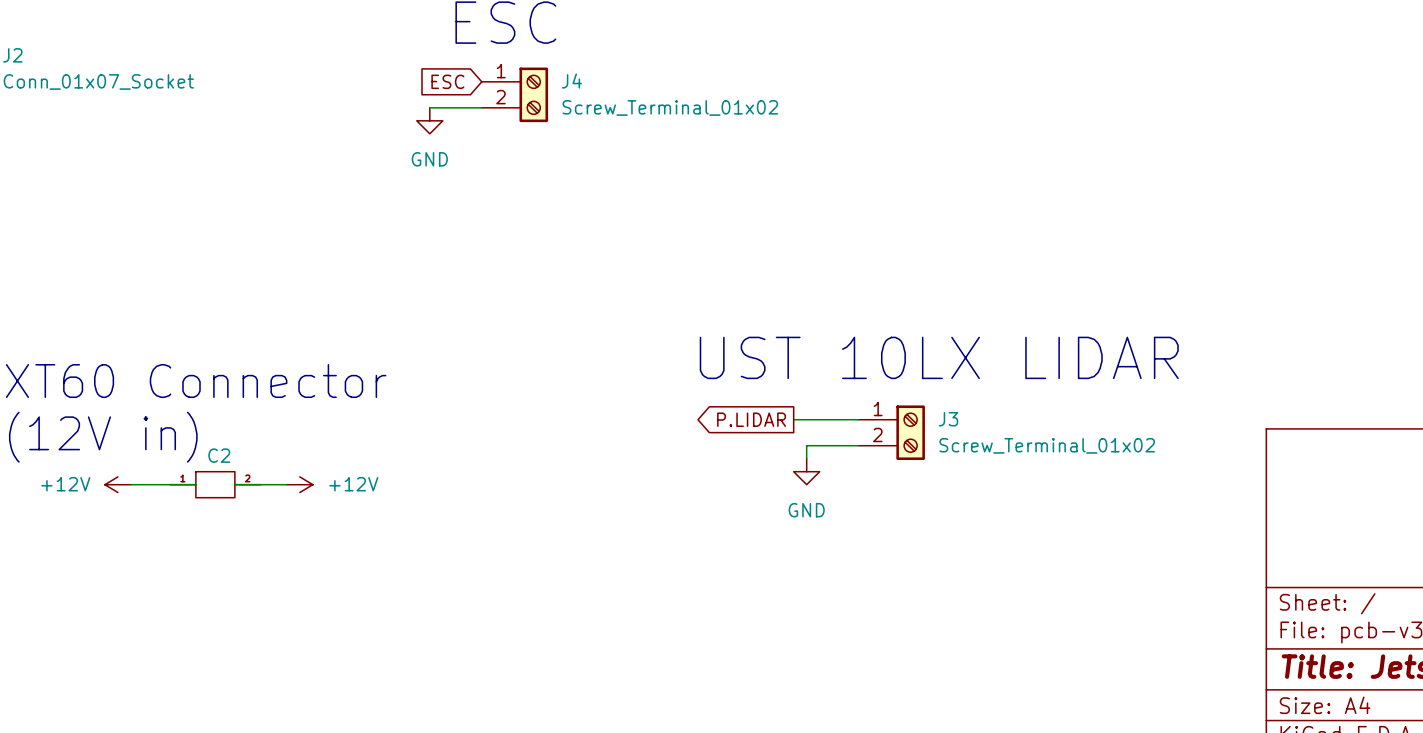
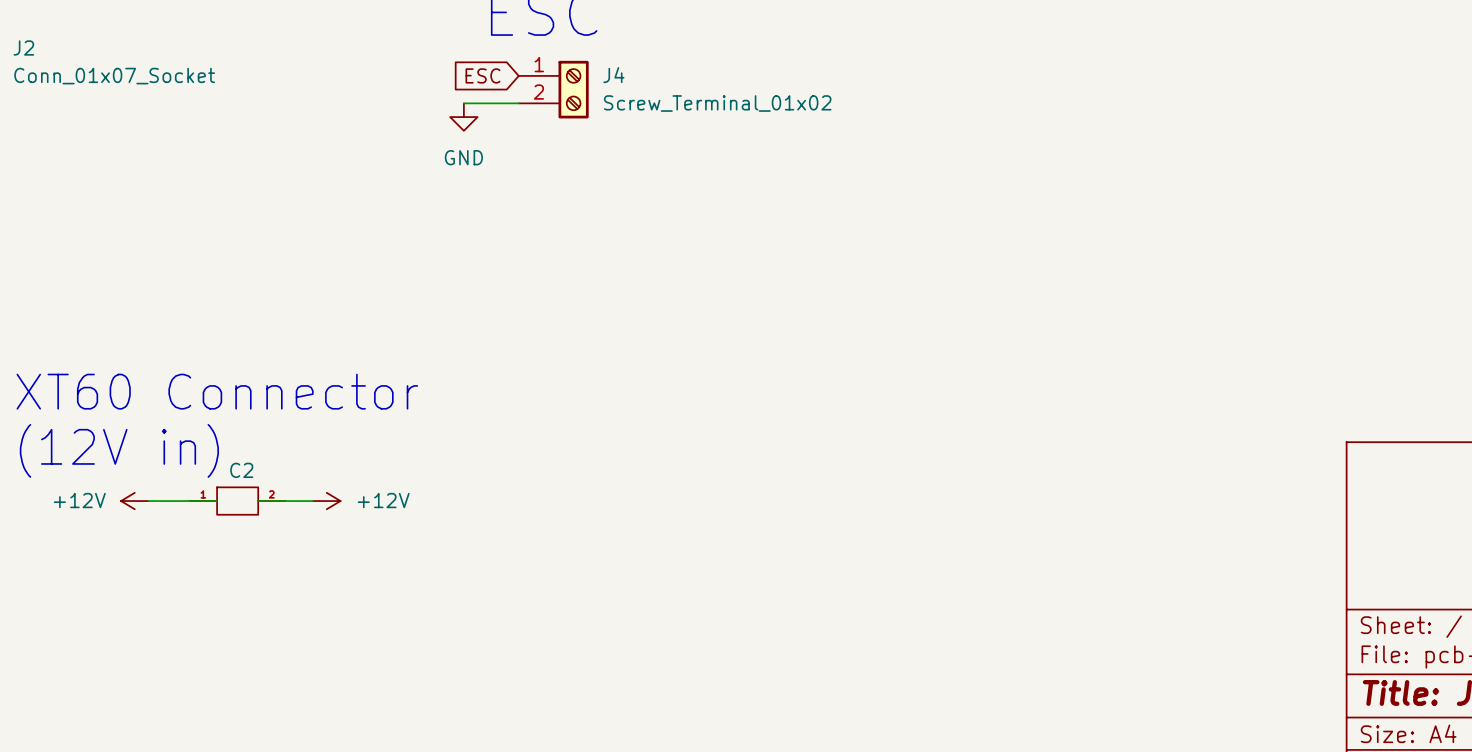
text: UST 10LX LIDAR (939, 357) -> none
global label: P.LIDAR (751, 419) -> none
wire: (793, 419) (858, 419) -> none
J3: Screw_Terminal_01x02 (891, 432) -> none
wire: (858, 445) (806, 445) (806, 458) -> none
power symbol: GND (806, 471) -> none

